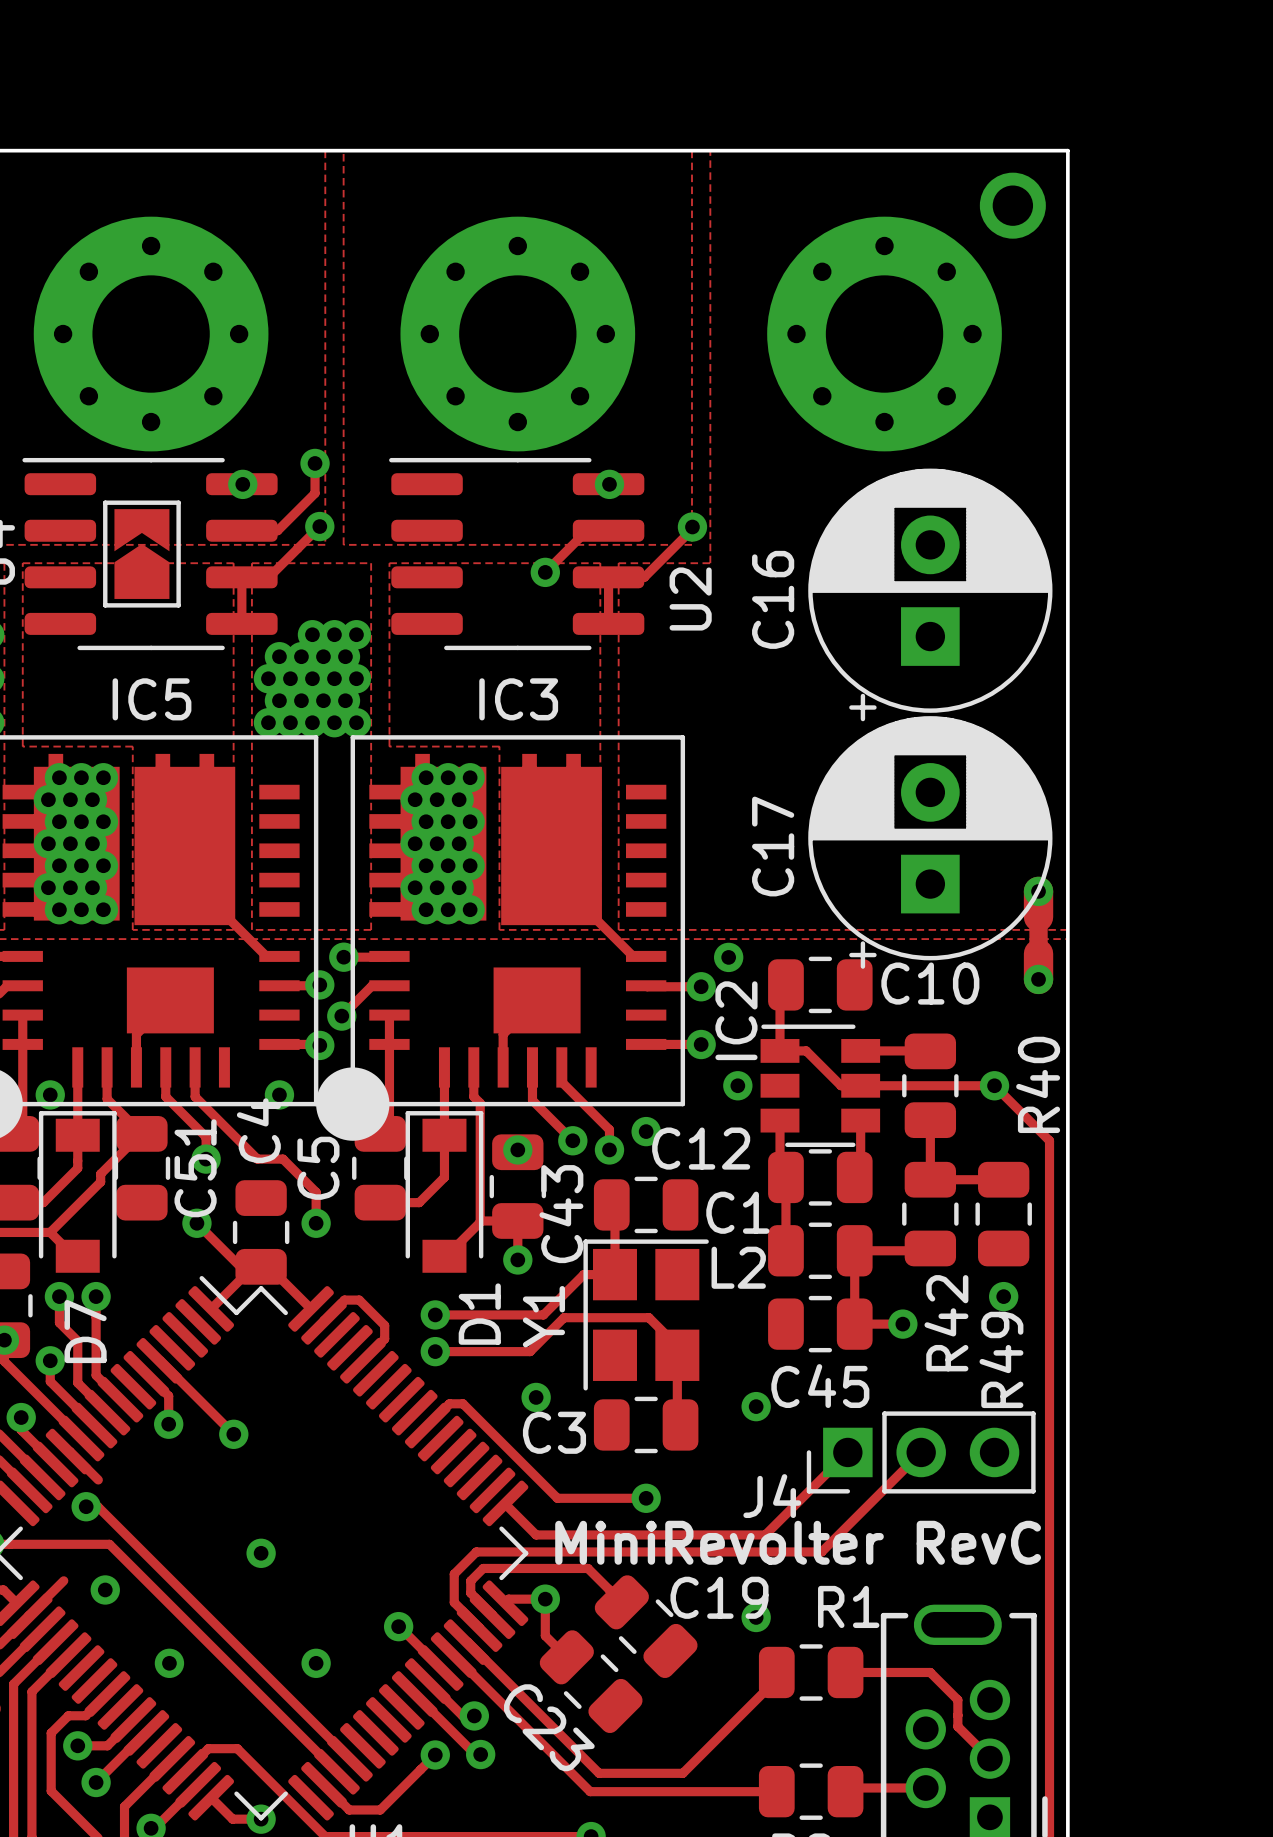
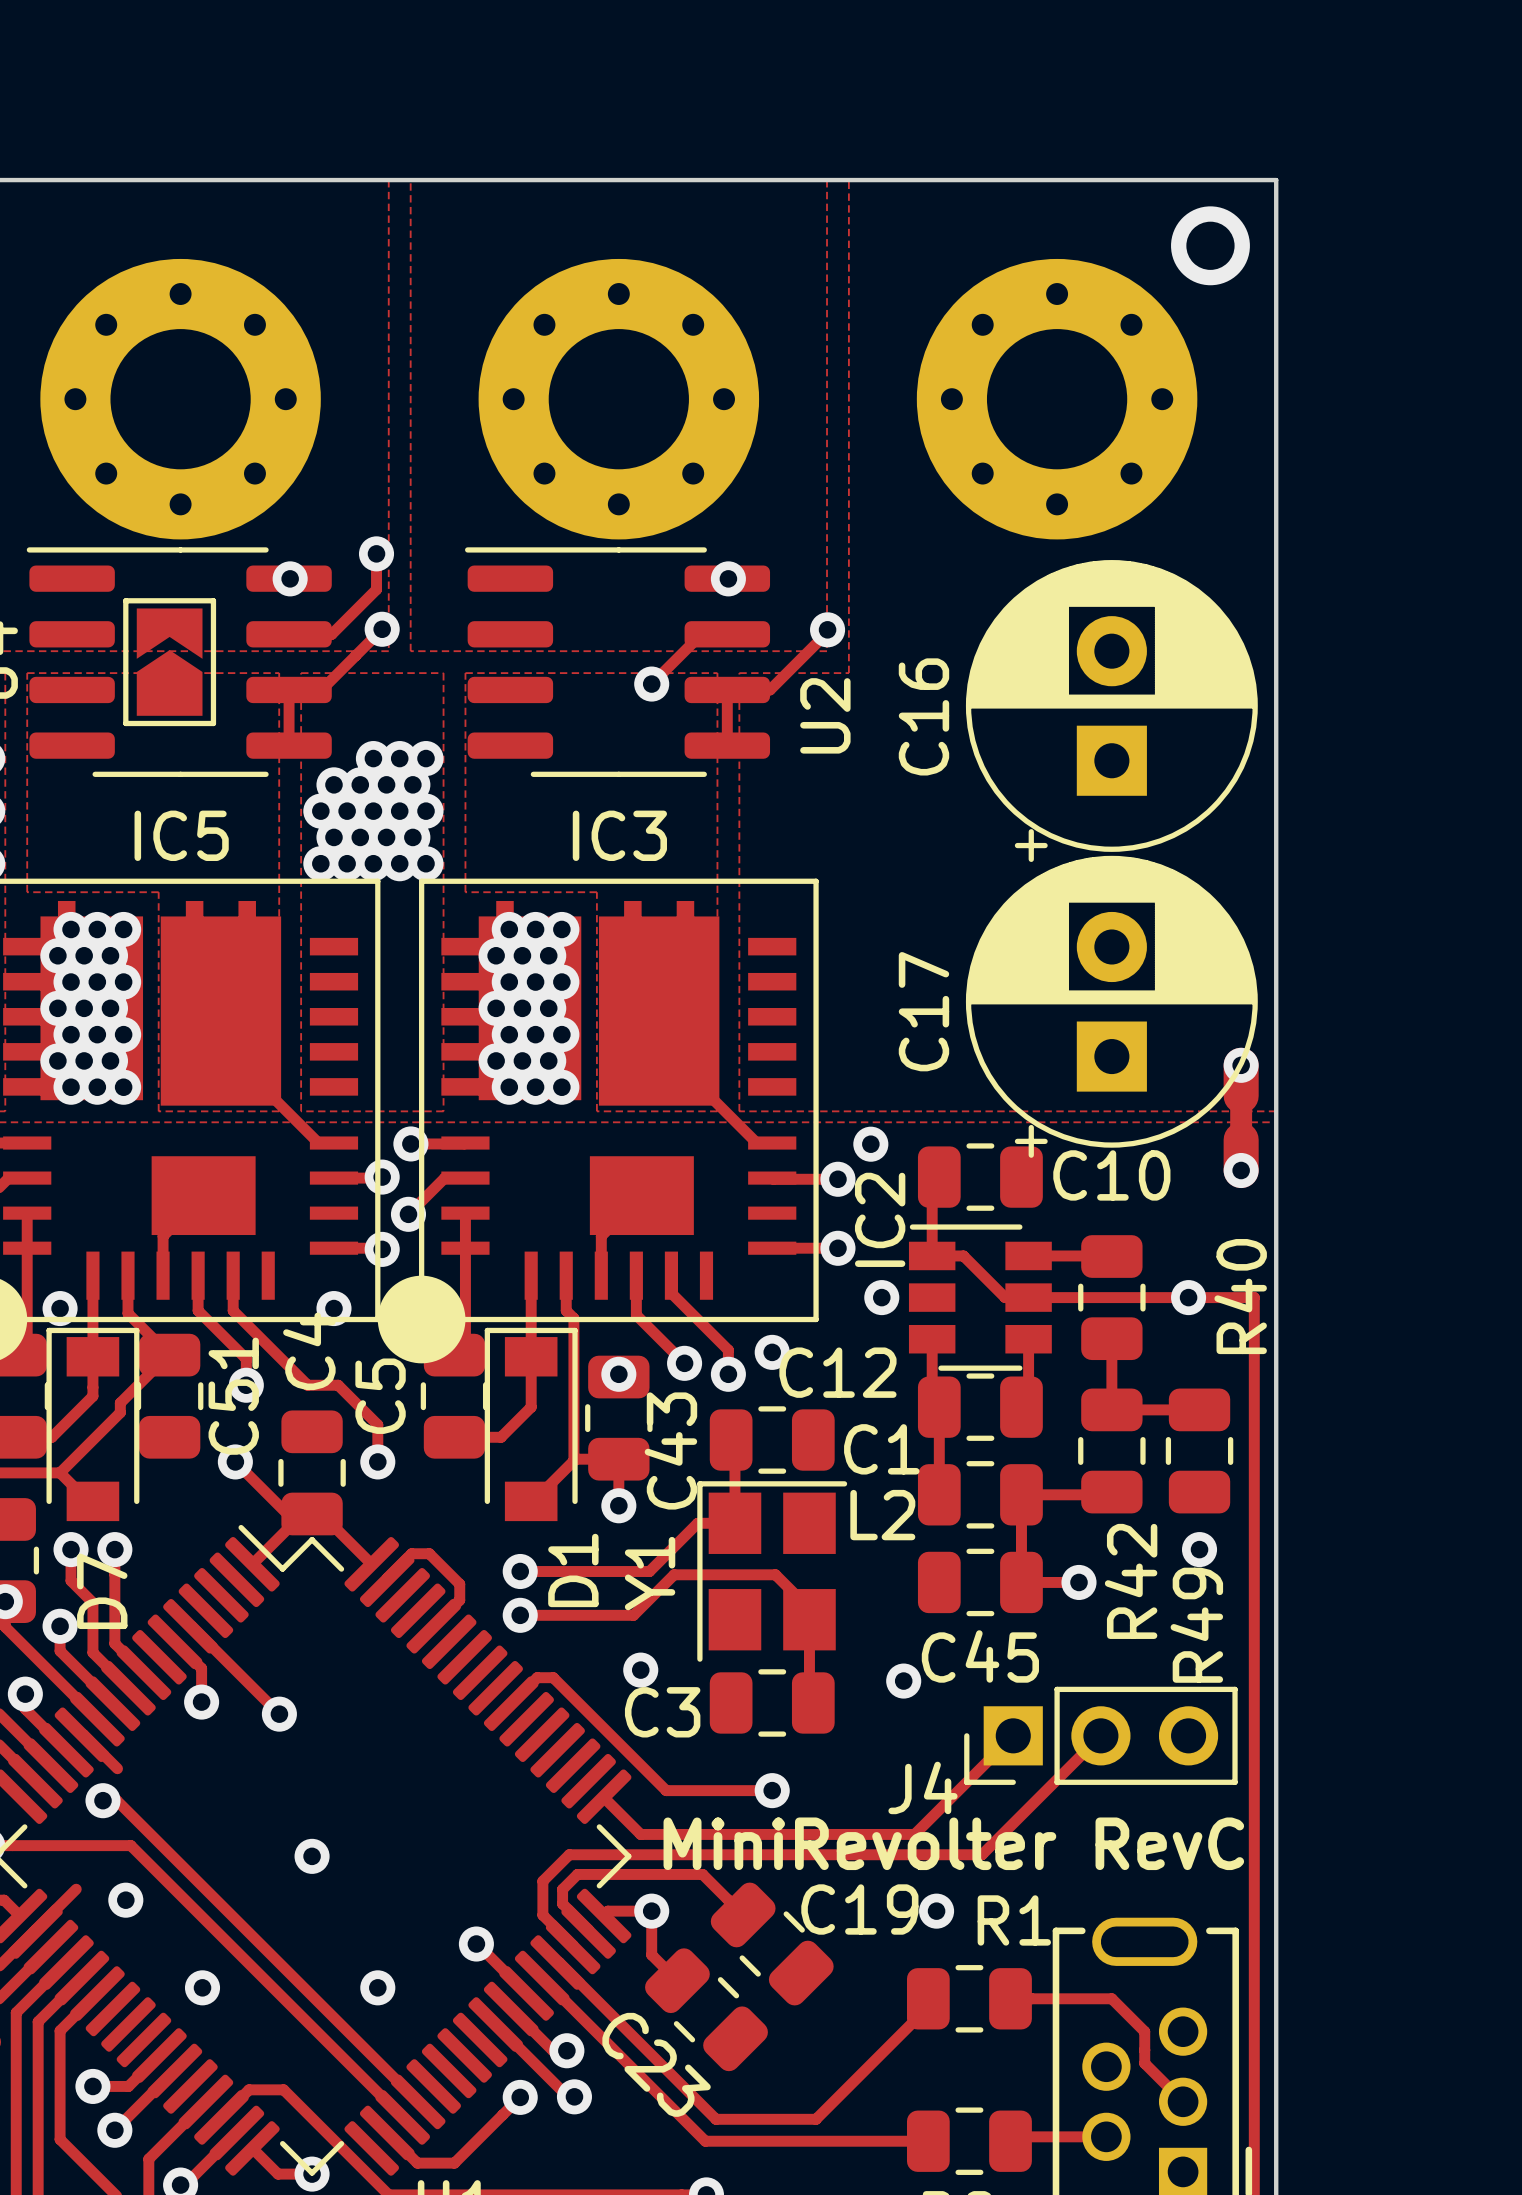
track: (994, 1085) (1049, 1140) -> (1188, 1297) (1254, 1297) (1254, 1363)
via position: (756, 1617) -> (936, 1911)
track: (107, 1693) (85, 1715) (68, 1715) (51, 1733) (51, 1791) -> (97, 1993) (60, 2030) (61, 2140)

